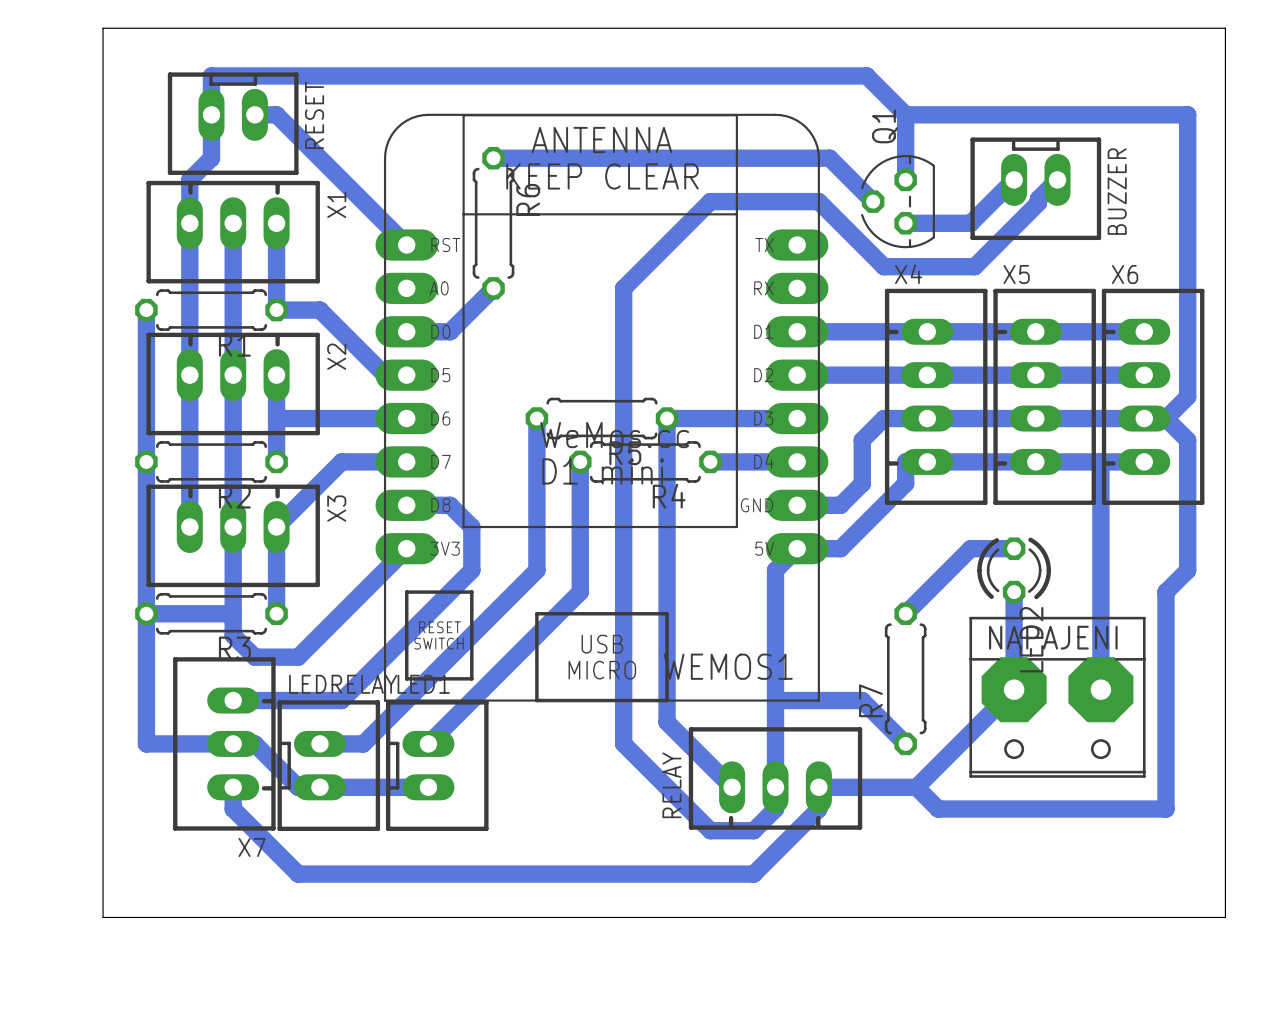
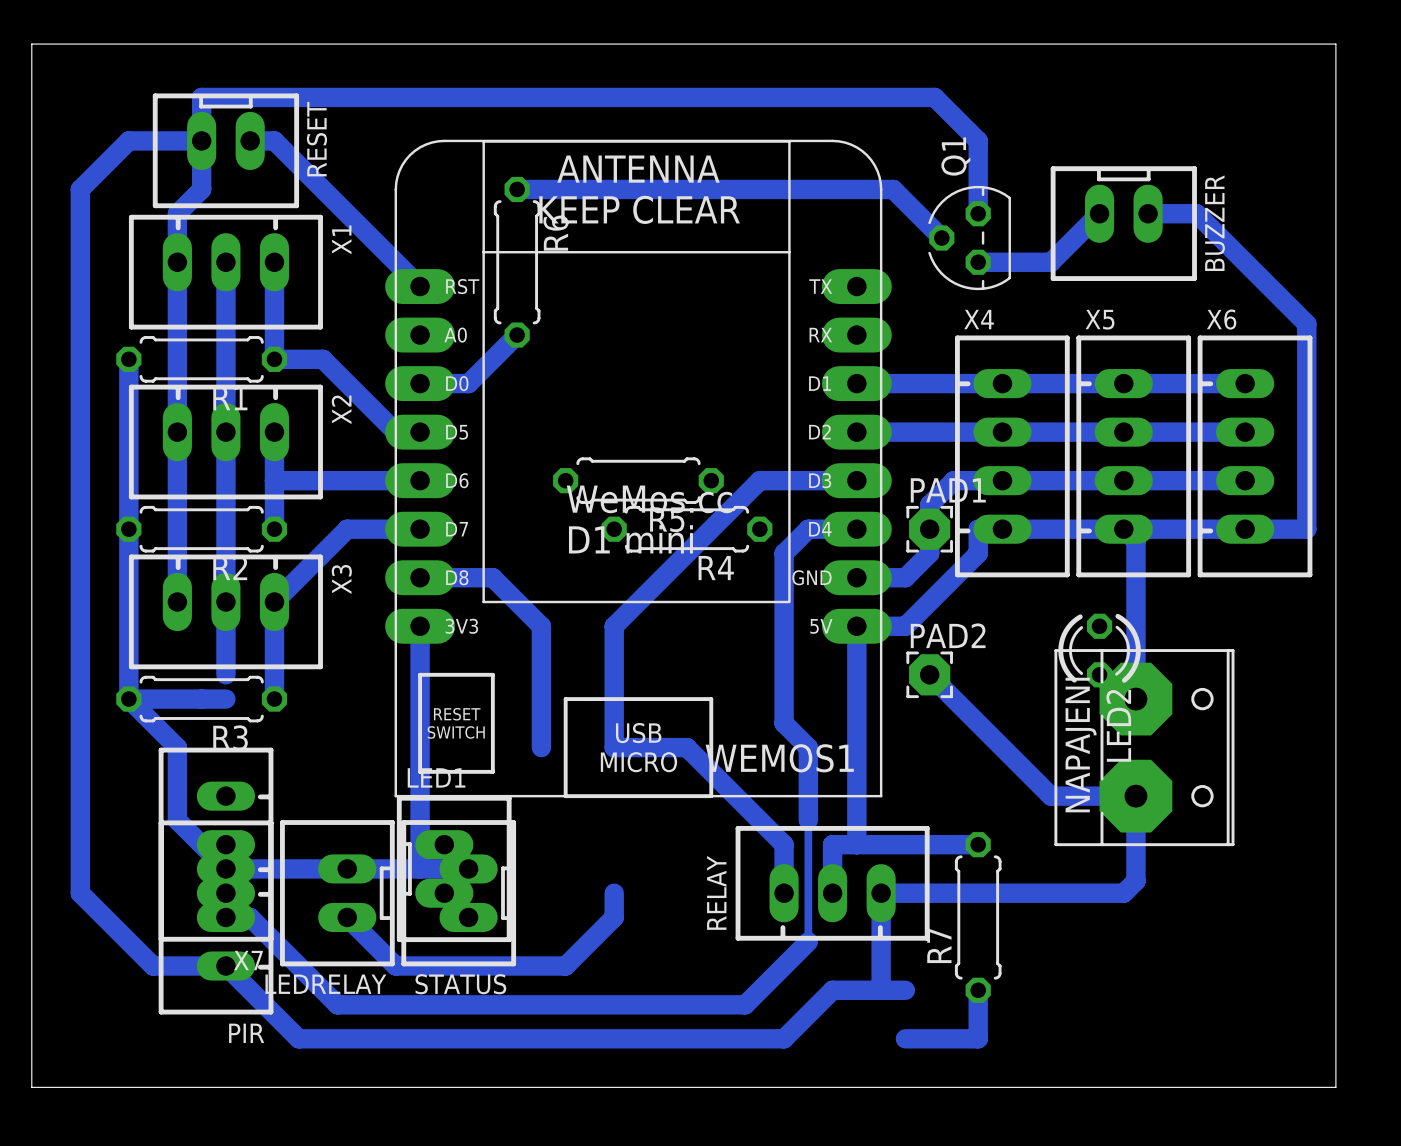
board edge: (103, 28) (103, 917) (1225, 917) -> (80, 44) (31, 44) (31, 1087) (1335, 1087) (1335, 1038)
bottom track: none -> (201, 140) (128, 140) (80, 189) (80, 893) (153, 966) (225, 966) (298, 1038) (784, 1038) (832, 990) (905, 990)
bottom track: (905, 114) (1187, 114) (1187, 396) (1165, 418) -> none
bottom track: (1057, 179) (1038, 199) (1038, 203) (974, 266) (883, 266) (818, 201) (710, 201) (623, 288) (623, 743) (710, 830) (753, 830) (775, 809) (775, 787) -> (1148, 213) (1196, 213) (1306, 323) (1306, 529) (1245, 529)
bottom track: (536, 418) (536, 570) (363, 743) (319, 743) -> none
bottom track: (710, 418) (667, 418) (667, 722) (732, 787) -> (614, 674) (614, 747) (687, 747) (784, 844) (784, 893)
bottom track: (1165, 418) (1187, 440) (1187, 570) (1165, 592) (1165, 809) (938, 809) (916, 787) (1014, 689) (1014, 592) -> none
bottom track: (580, 461) (580, 548) -> (759, 480) (614, 626)
bottom track: (710, 461) (753, 461) -> (225, 917) (250, 917) (337, 1004) (745, 1004) (808, 941) (808, 747) (784, 723) (784, 553) (808, 529)
PAD1: none -> (929, 529)
bottom track: none -> (1123, 529) (1135, 541) (1135, 699)
bottom track: (1100, 461) (1100, 689) -> none
bottom track: (450, 505) (471, 527) (471, 570) (341, 700) (233, 700) -> (468, 577) (492, 577) (541, 626) (541, 747)
bottom track: (406, 548) (298, 657) (254, 657) (233, 635) (233, 592) -> (420, 626) (420, 868)
bottom track: (797, 548) (775, 570) (775, 743) -> (856, 626) (856, 844)
bottom track: (1014, 548) (970, 548) (905, 613) -> none
bottom track: (580, 592) (428, 743) -> none
bottom track: none -> (929, 674) (1051, 796) (1135, 796) (1135, 881) (1123, 893) (990, 893)
PAD2: none -> (929, 674)
bottom track: (146, 613) (146, 743) (254, 743) (298, 787) (428, 787) -> (128, 699) (177, 747) (177, 820) (225, 868) (468, 868)
R7 position: (905, 678) -> (978, 917)
NAPAJENI rotation: 0° (1057, 697) -> 90° counterclockwise (1144, 747)
bottom track: (775, 700) (862, 700) (905, 743) -> (832, 844) (978, 844)
LEDRELAY rotation: 0° (328, 765) -> 180° (337, 893)
bottom track: (233, 787) (233, 809) (298, 874) (753, 874) (818, 809) -> (881, 990) (881, 917)
STATUS: none -> (458, 893)
bottom track: none -> (614, 893) (614, 917) (565, 966) (395, 966) (347, 917)
PIR: none -> (216, 917)
bottom track: none -> (978, 990) (978, 1038) (905, 1038)

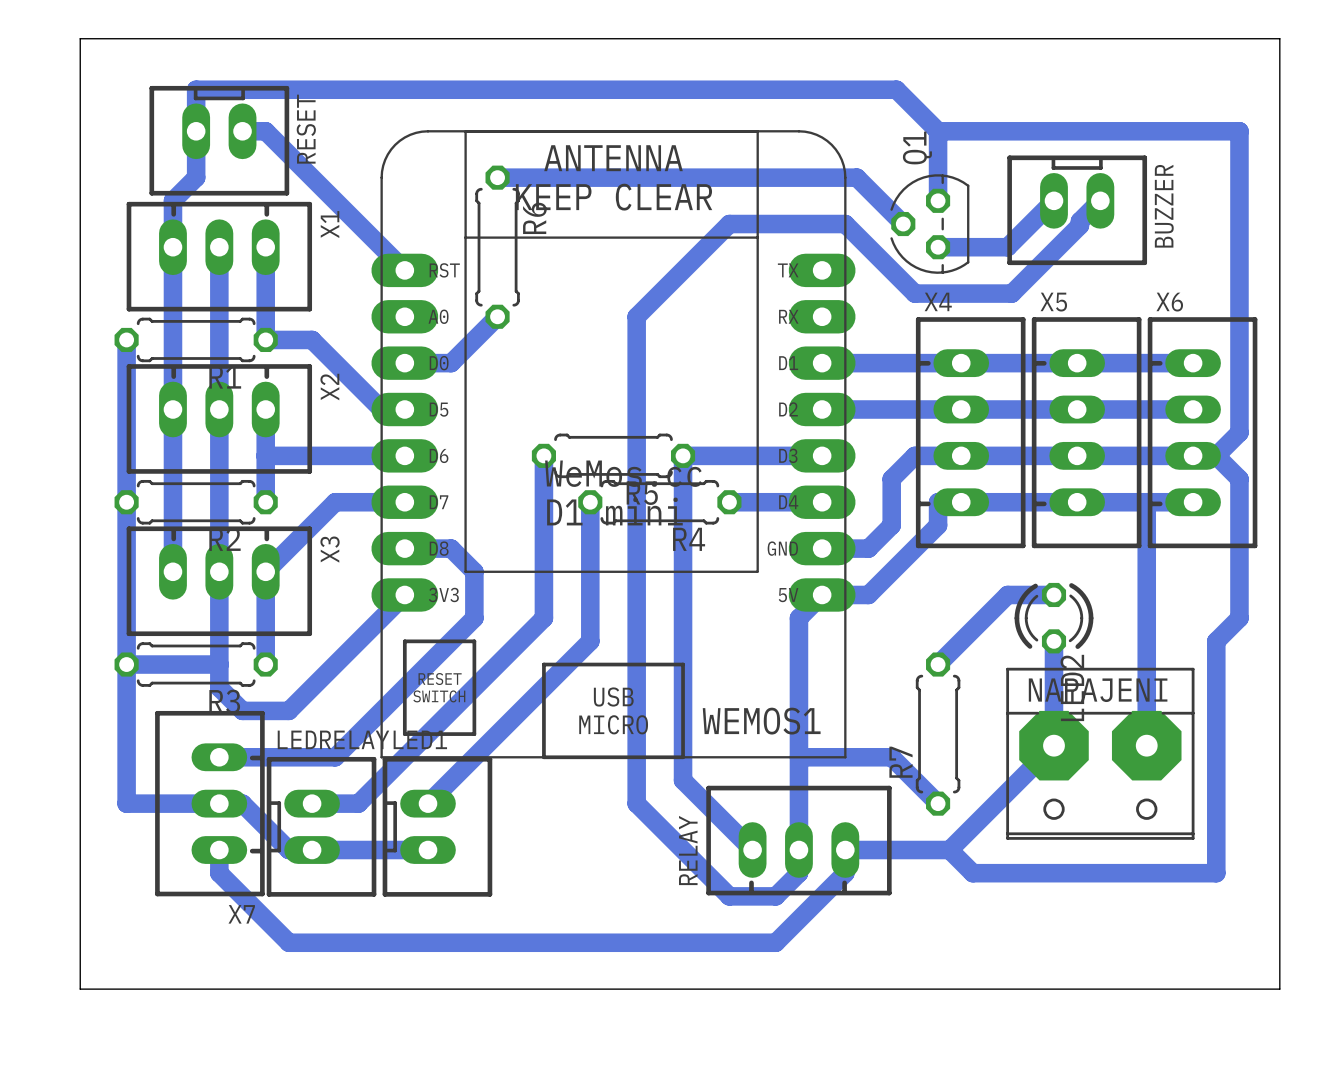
board edge: (80, 44) (31, 44) (31, 1087) (1335, 1087) (1335, 1038) -> (80, 38) (80, 989) (1279, 989)
bottom track: (201, 140) (128, 140) (80, 189) (80, 893) (153, 966) (225, 966) (298, 1038) (784, 1038) (832, 990) (905, 990) -> none
bottom track: none -> (938, 131) (1239, 131) (1239, 432) (1216, 455)
bottom track: (1148, 213) (1196, 213) (1306, 323) (1306, 529) (1245, 529) -> (1100, 200) (1079, 221) (1079, 225) (1011, 293) (914, 293) (845, 224) (729, 224) (636, 316) (636, 803) (729, 896) (775, 896) (798, 873) (798, 850)
bottom track: none -> (543, 455) (543, 618) (358, 803) (312, 803)
bottom track: (759, 480) (614, 626) -> (590, 502) (590, 594)
bottom track: none -> (1216, 455) (1239, 479) (1239, 618) (1216, 641) (1216, 873) (972, 873) (949, 850) (1053, 745) (1053, 641)
bottom track: (808, 529) (784, 553) (784, 723) (808, 747) (808, 941) (745, 1004) (337, 1004) (250, 917) (225, 917) -> (775, 502) (729, 502)
PAD1: (929, 529) -> none
bottom track: (1123, 529) (1135, 541) (1135, 699) -> none
bottom track: none -> (1146, 502) (1146, 745)
bottom track: (468, 577) (492, 577) (541, 626) (541, 747) -> (451, 548) (474, 571) (474, 618) (335, 757) (219, 757)
bottom track: (420, 626) (420, 868) -> (404, 594) (288, 710) (242, 710) (219, 687) (219, 641)
bottom track: (856, 626) (856, 844) -> (822, 594) (798, 618) (798, 803)
bottom track: none -> (1053, 594) (1007, 594) (938, 664)
bottom track: (614, 674) (614, 747) (687, 747) (784, 844) (784, 893) -> (729, 455) (683, 455) (683, 780) (752, 850)
bottom track: none -> (590, 641) (428, 803)
bottom track: (929, 674) (1051, 796) (1135, 796) (1135, 881) (1123, 893) (990, 893) -> none
PAD2: (929, 674) -> none
bottom track: (128, 699) (177, 747) (177, 820) (225, 868) (468, 868) -> (126, 664) (126, 803) (242, 803) (288, 850) (428, 850)
NAPAJENI rotation: 0° (1144, 747) -> 90° clockwise (1100, 753)
bottom track: (832, 844) (978, 844) -> (798, 757) (891, 757) (938, 803)
LEDRELAY rotation: 0° (337, 893) -> 180° (321, 826)
STATUS: (458, 893) -> none
bottom track: (614, 893) (614, 917) (565, 966) (395, 966) (347, 917) -> none
PIR: (216, 917) -> none
bottom track: (881, 917) (881, 990) -> (845, 873) (775, 942) (288, 942) (219, 873) (219, 850)
R7 position: (978, 917) -> (938, 734)
bottom track: (978, 990) (978, 1038) (905, 1038) -> none

